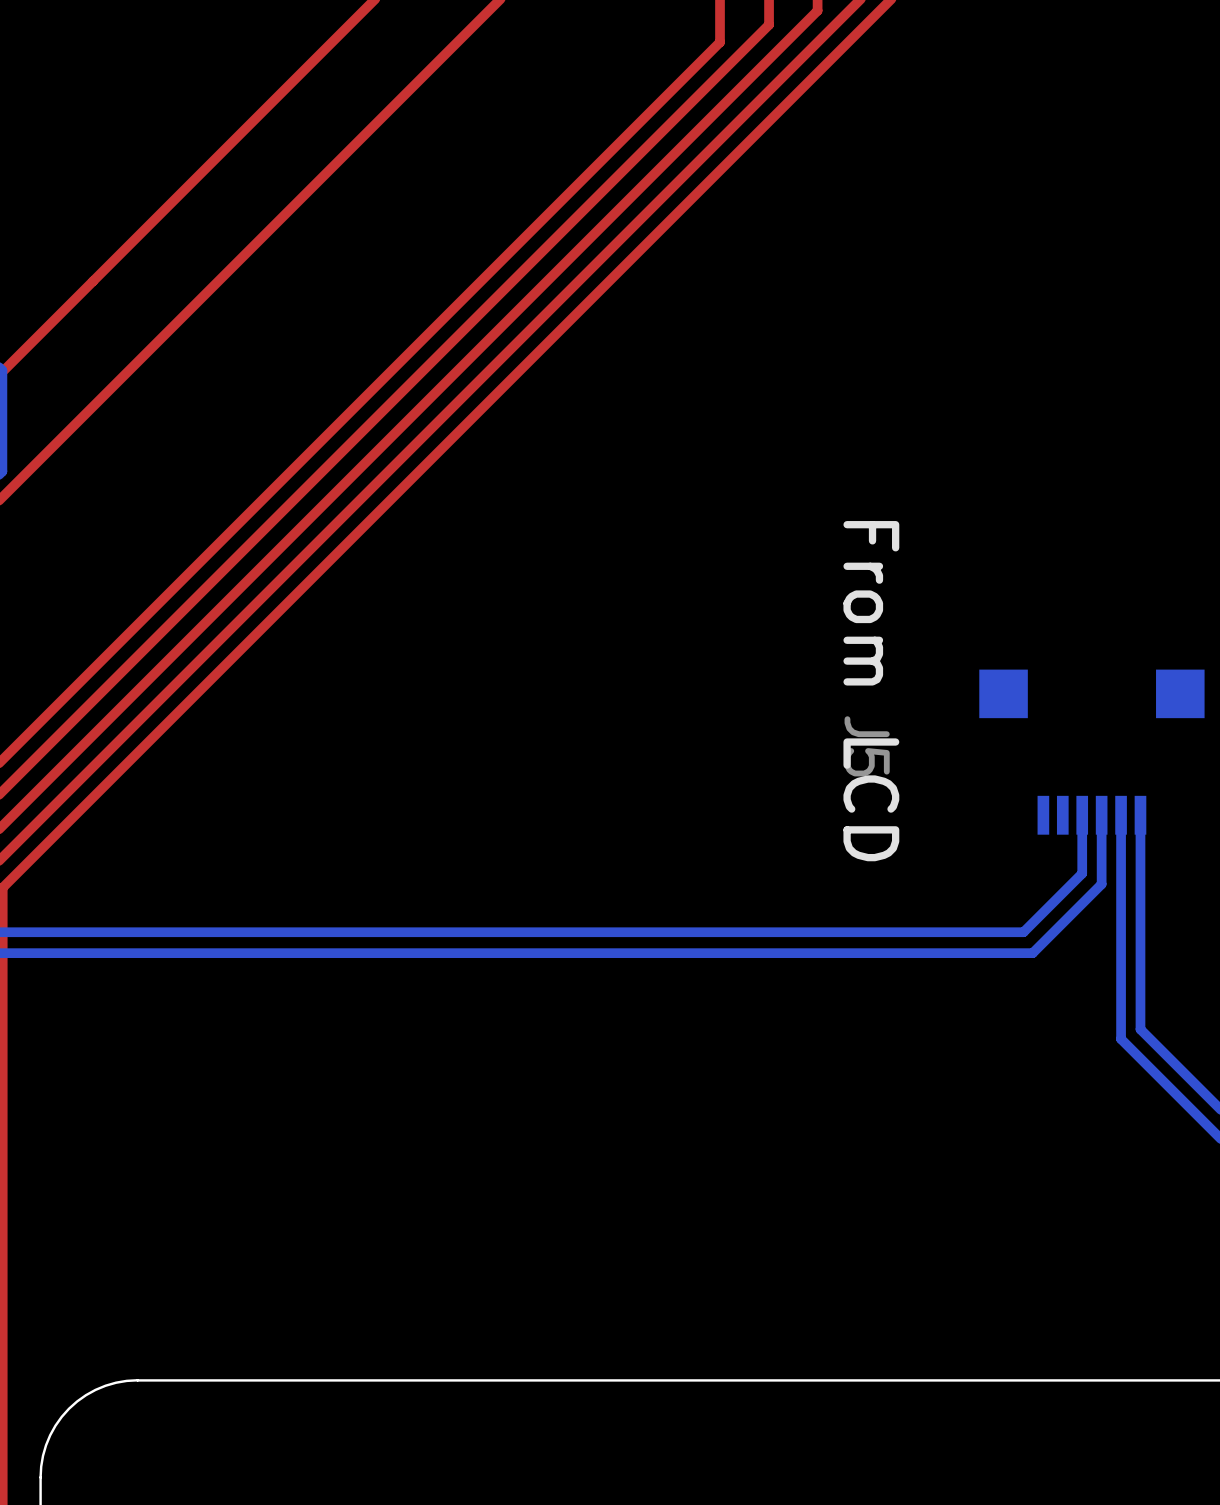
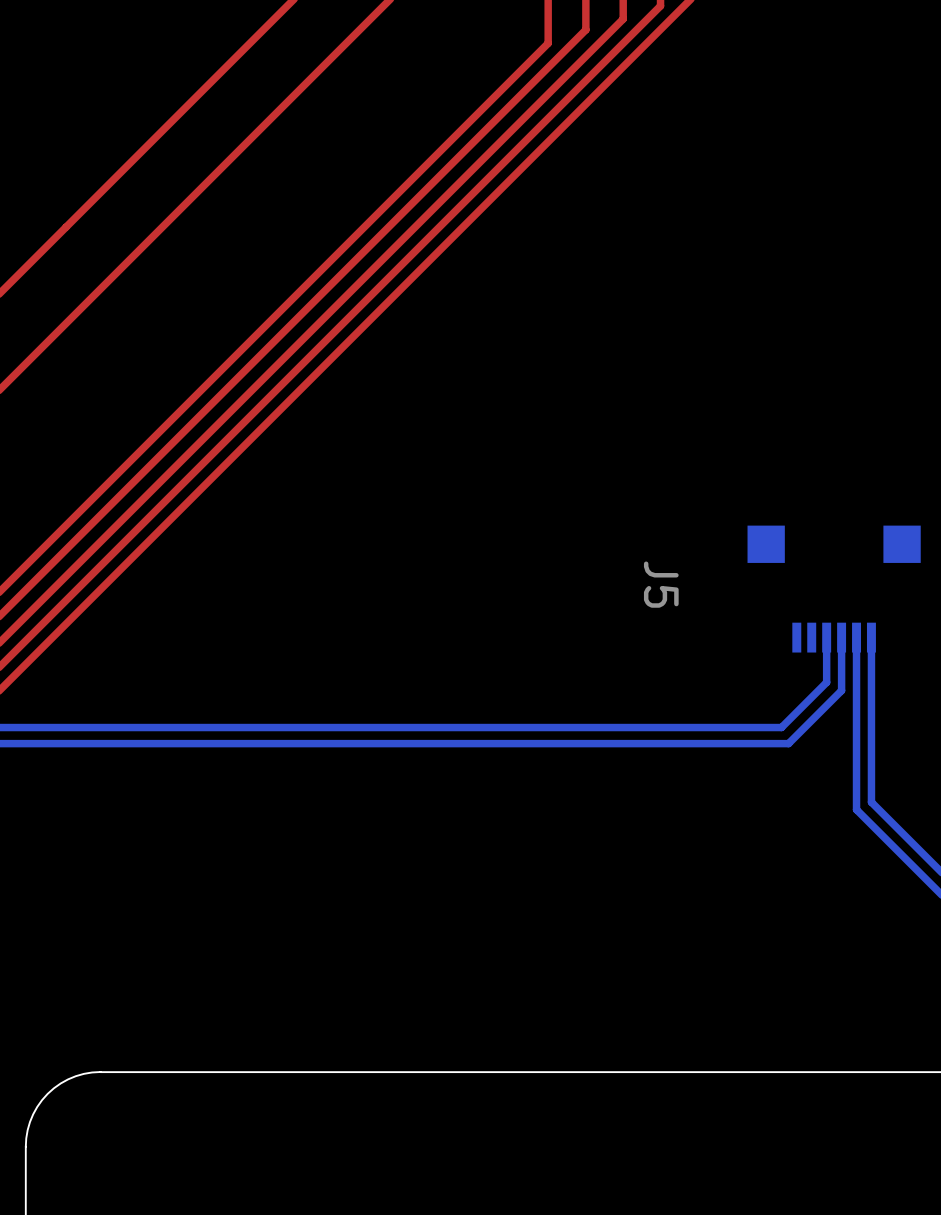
J5 value: From LCD (871, 691) -> none

